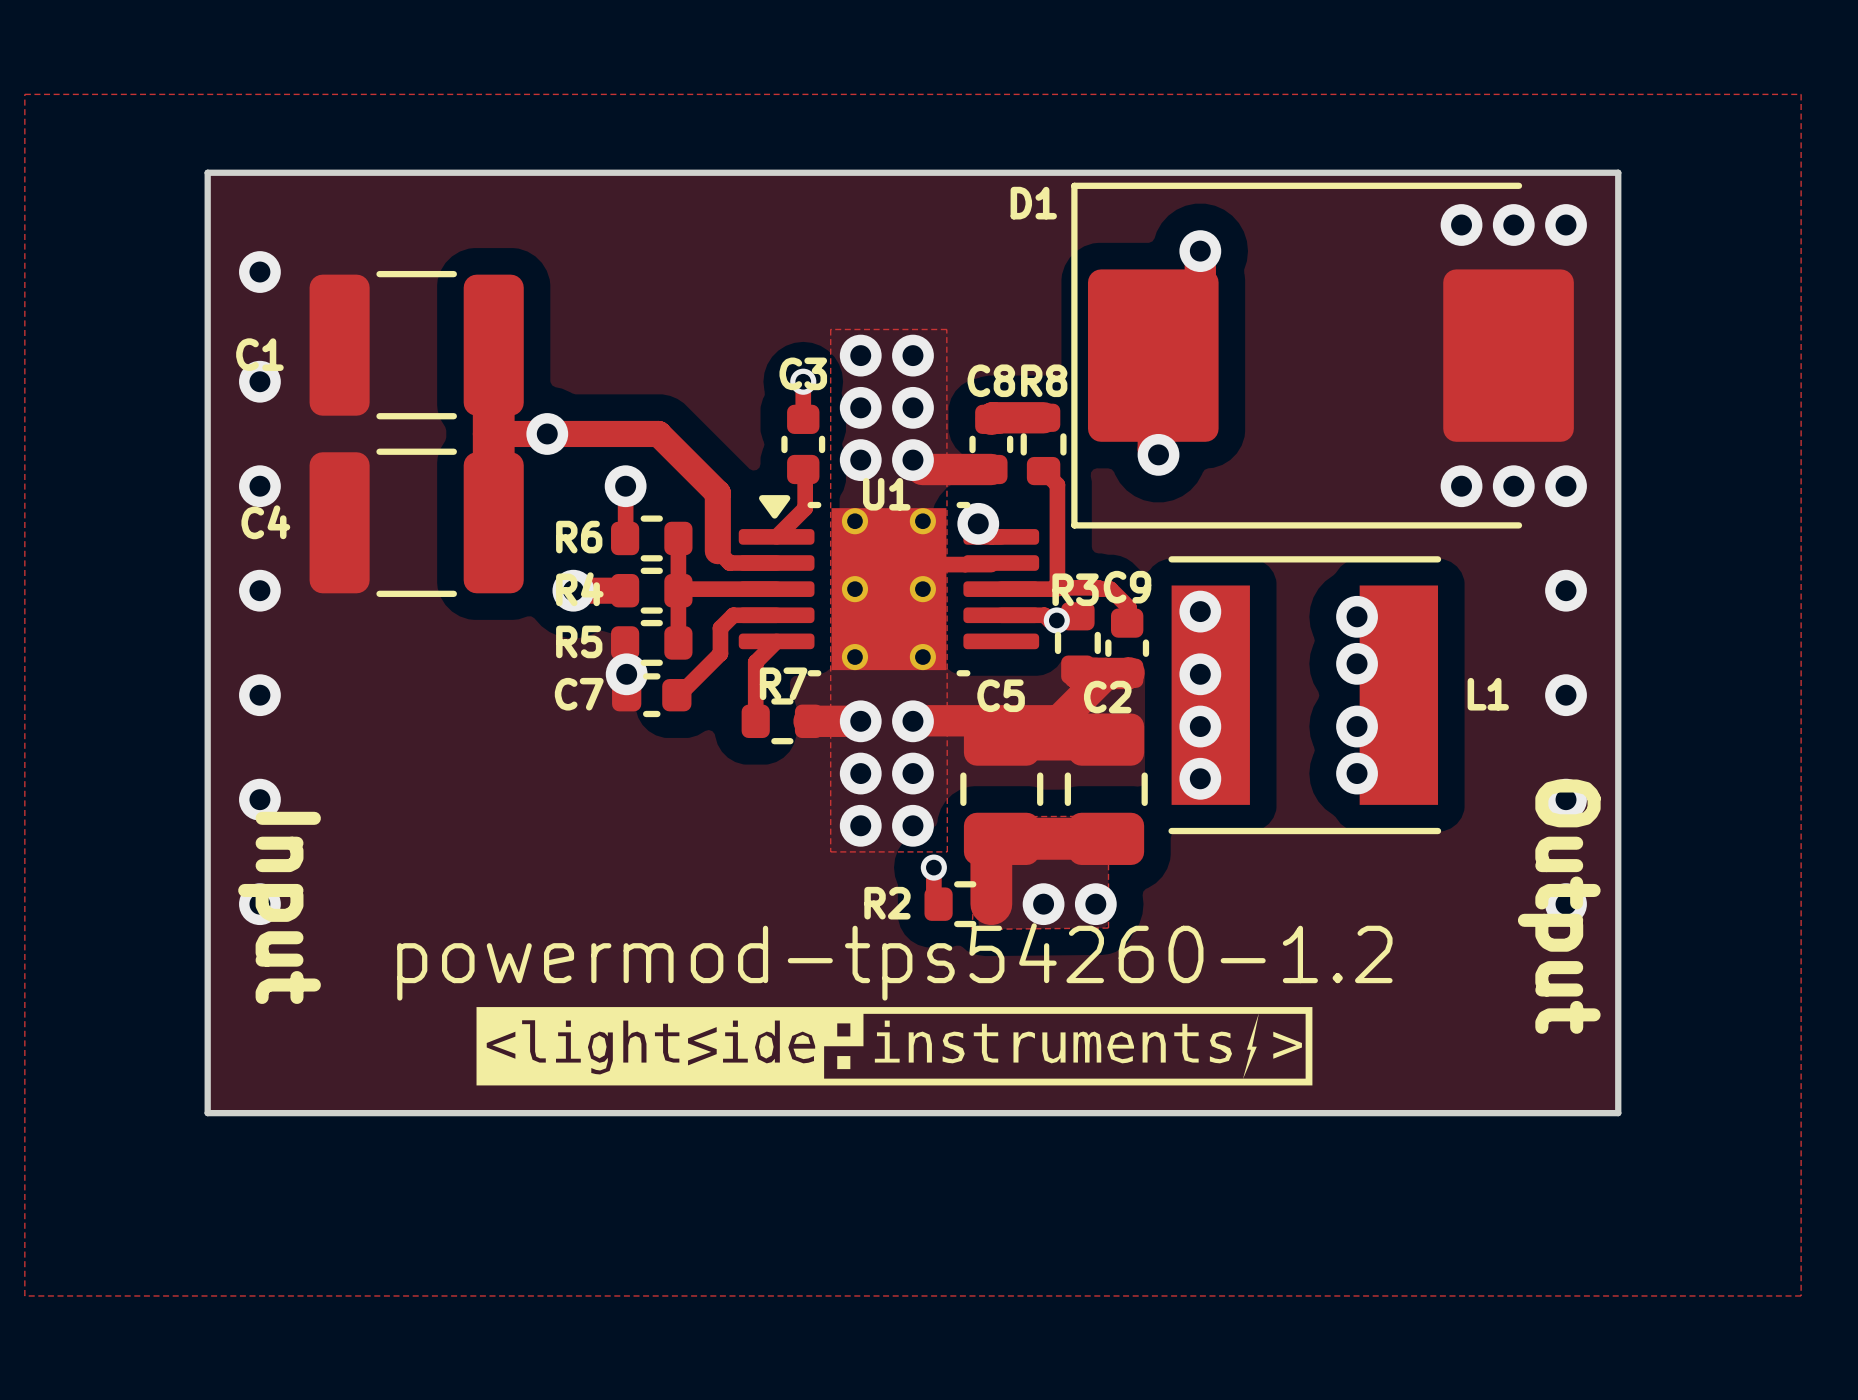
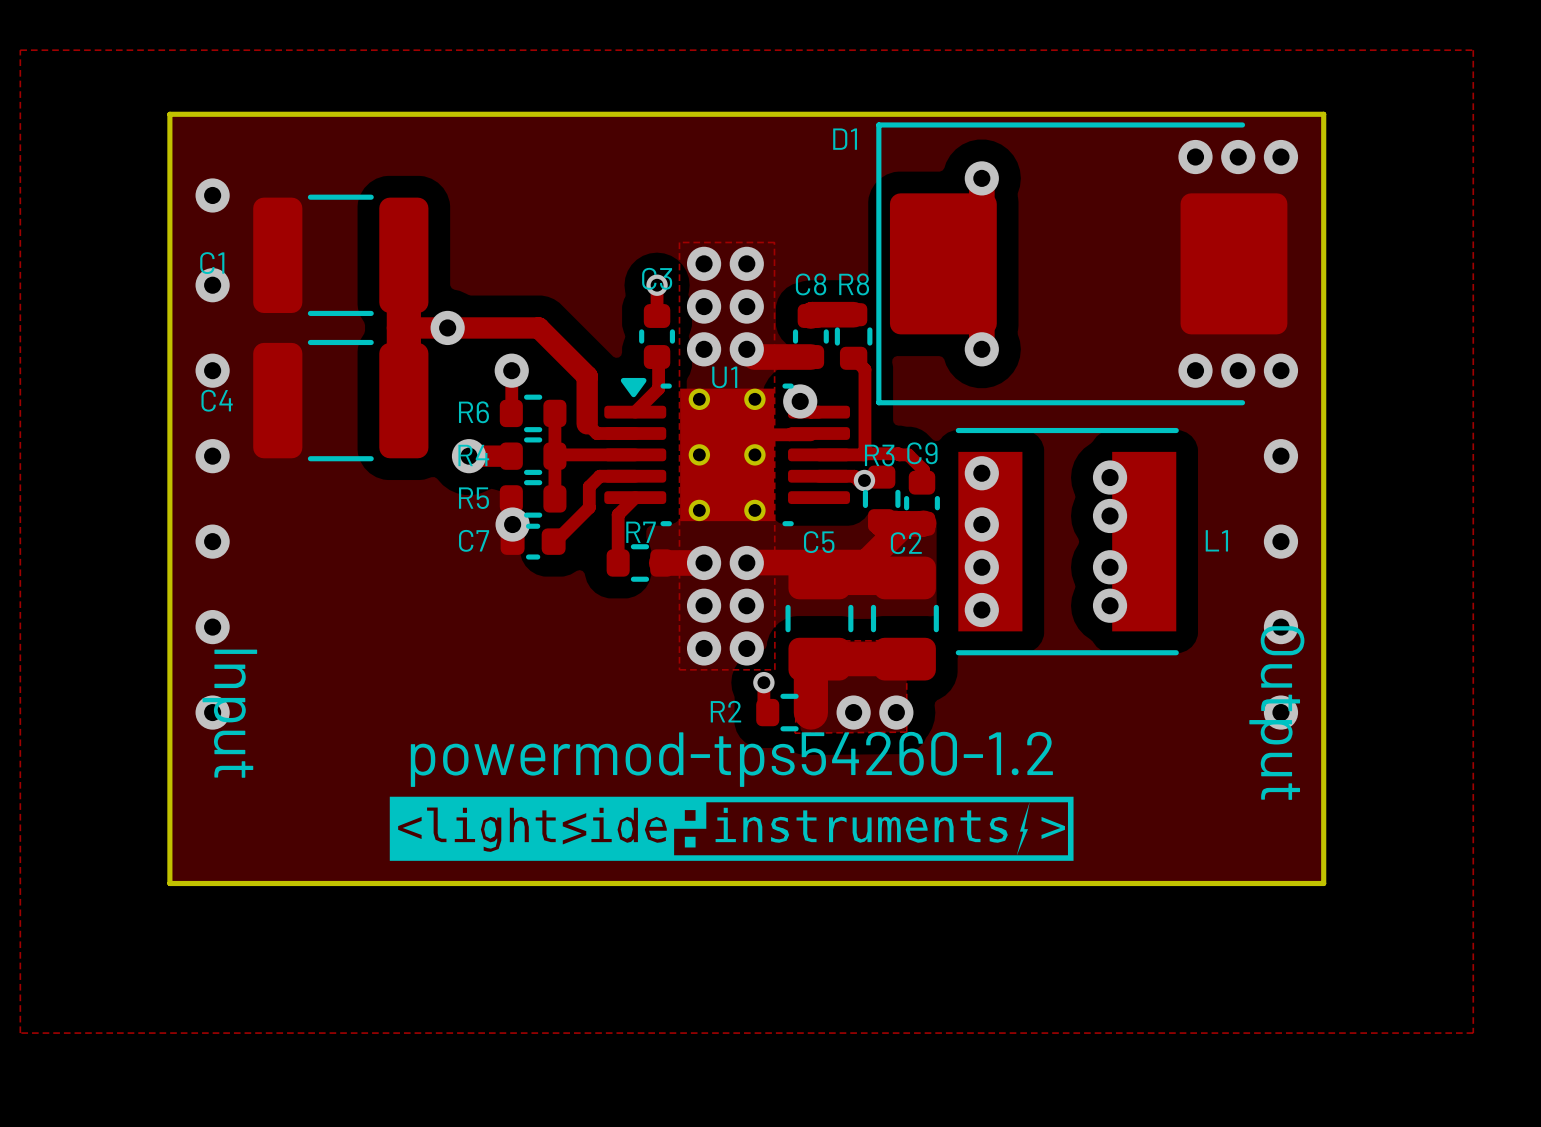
via position: (1158, 454) -> (981, 349)

